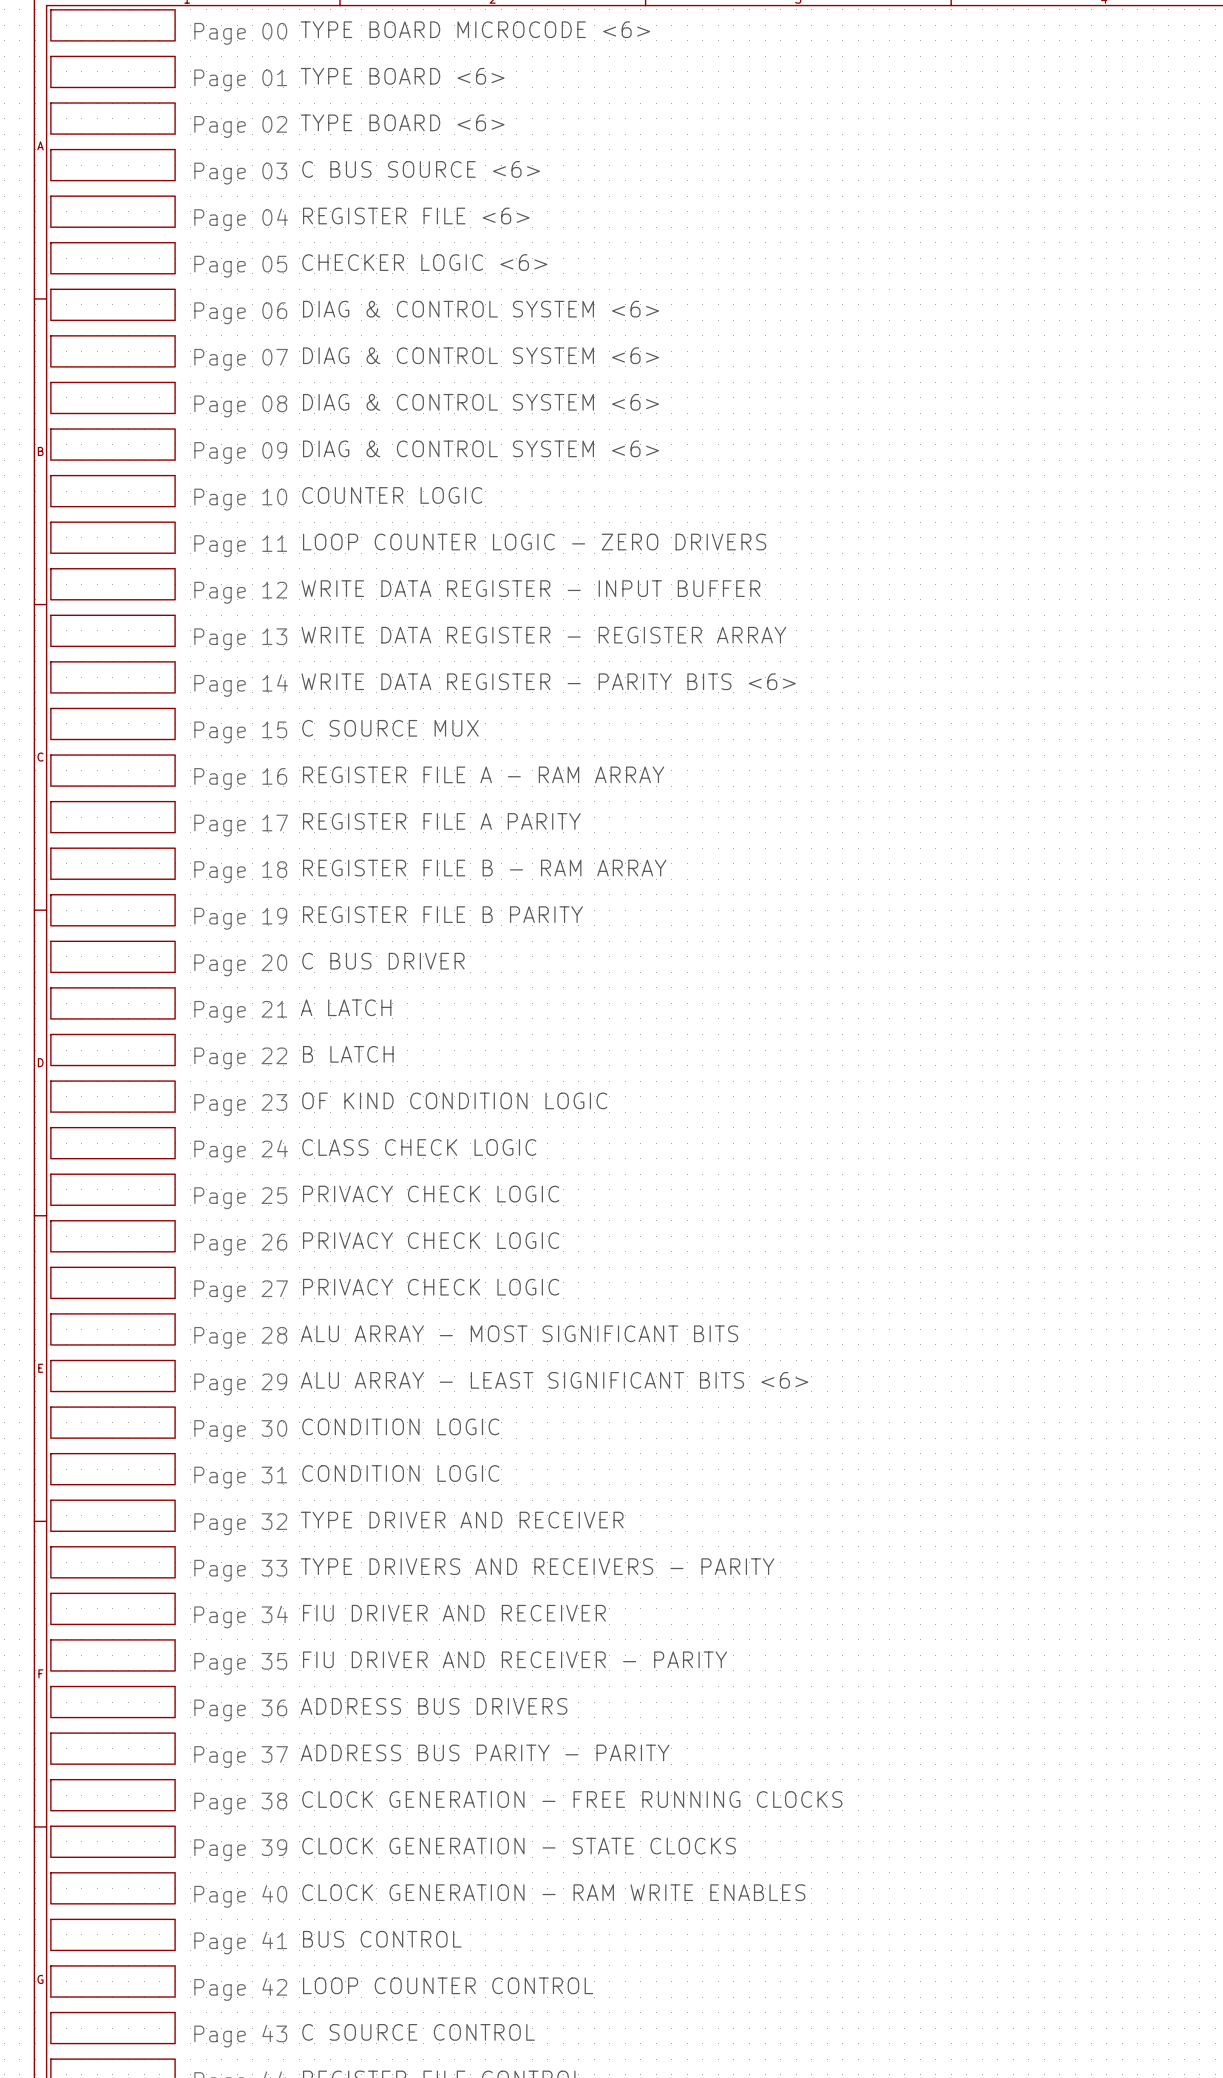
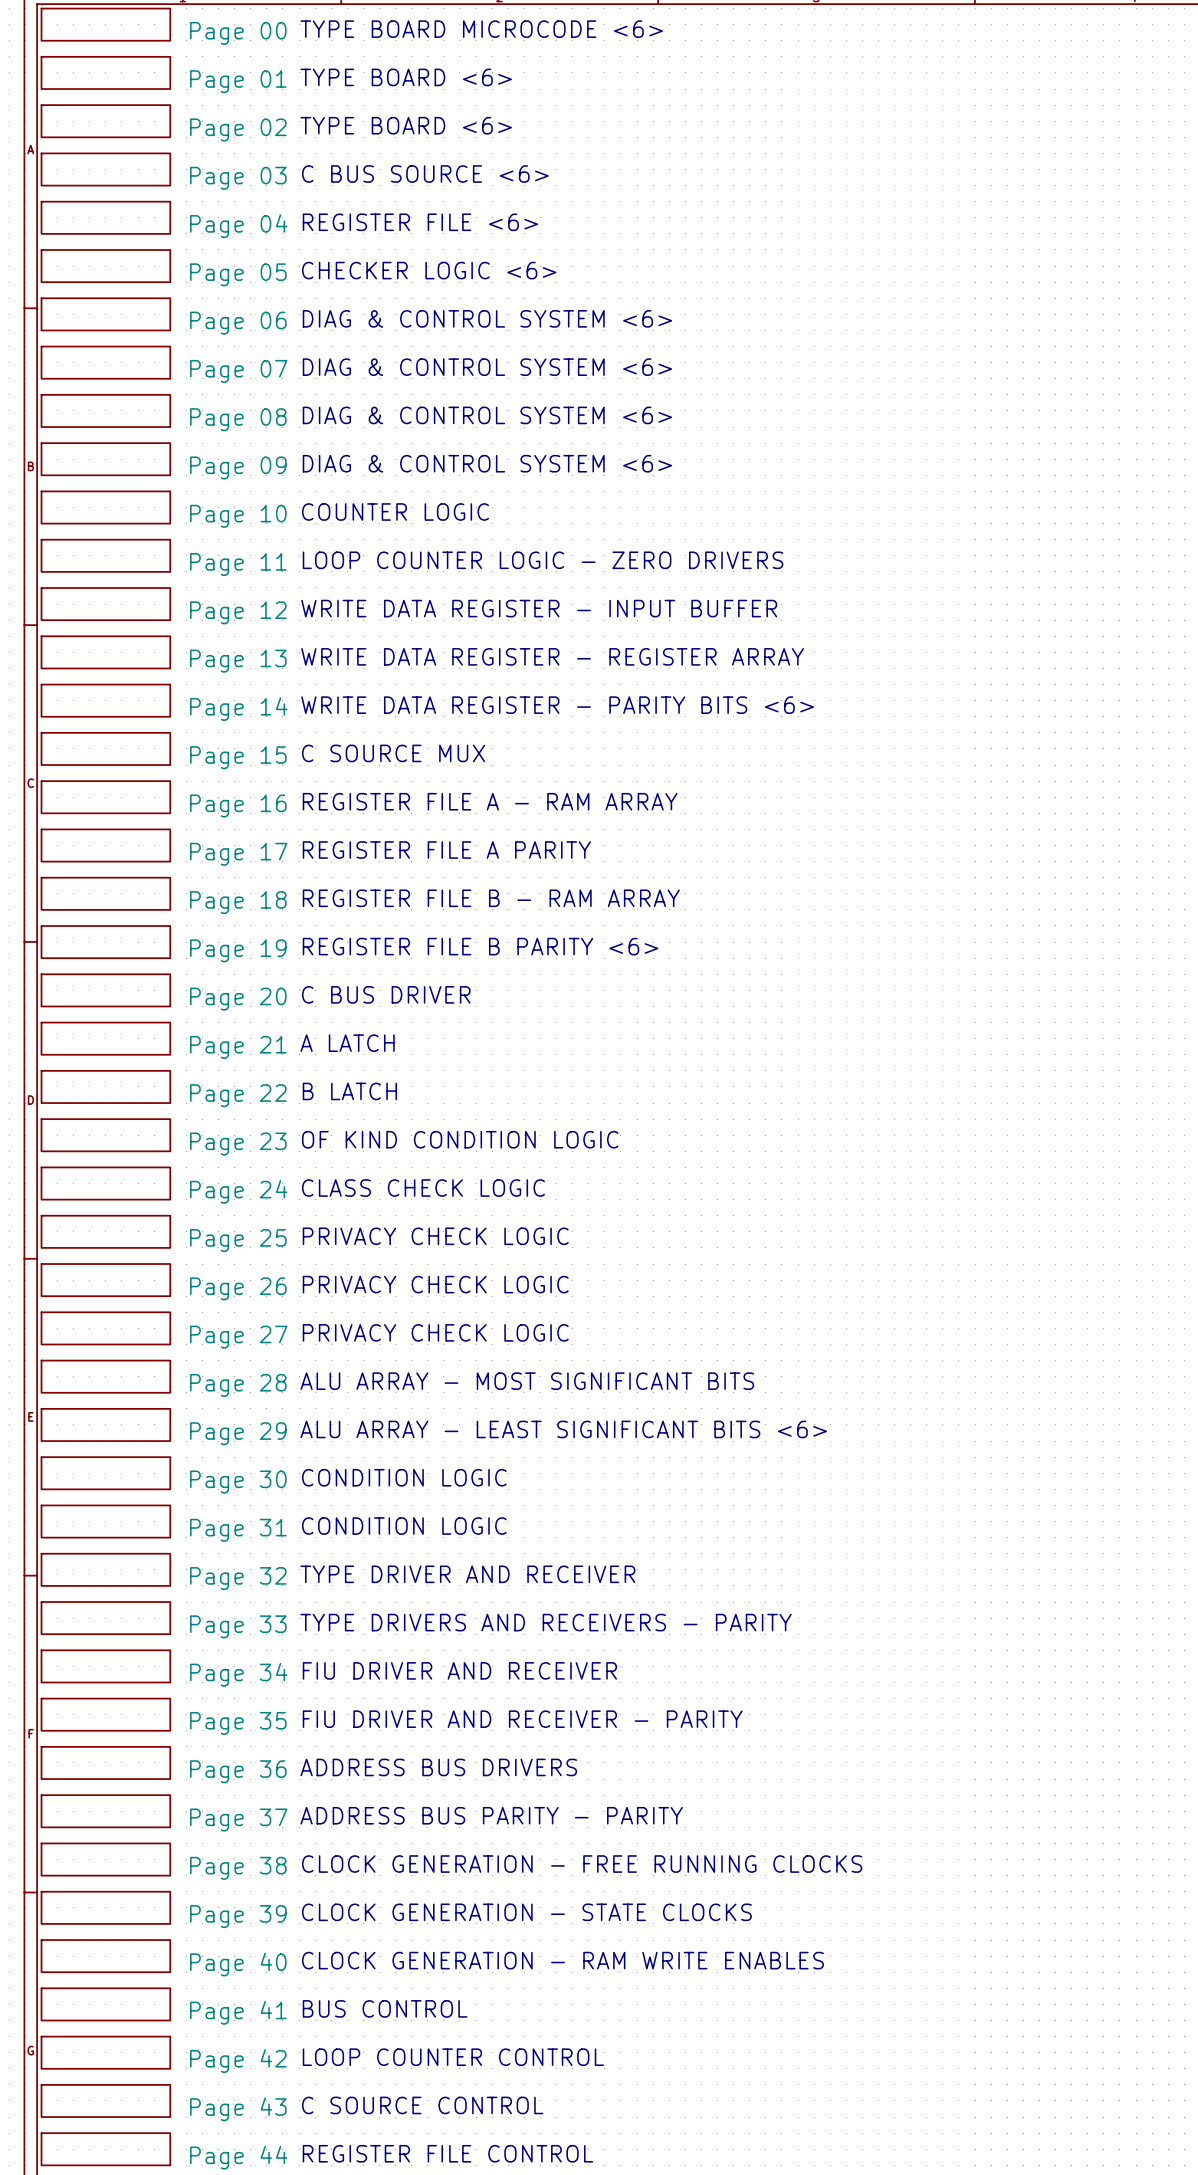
text: REGISTER FILE B PARITY (442, 914) -> REGISTER FILE B PARITY <6> (480, 946)

